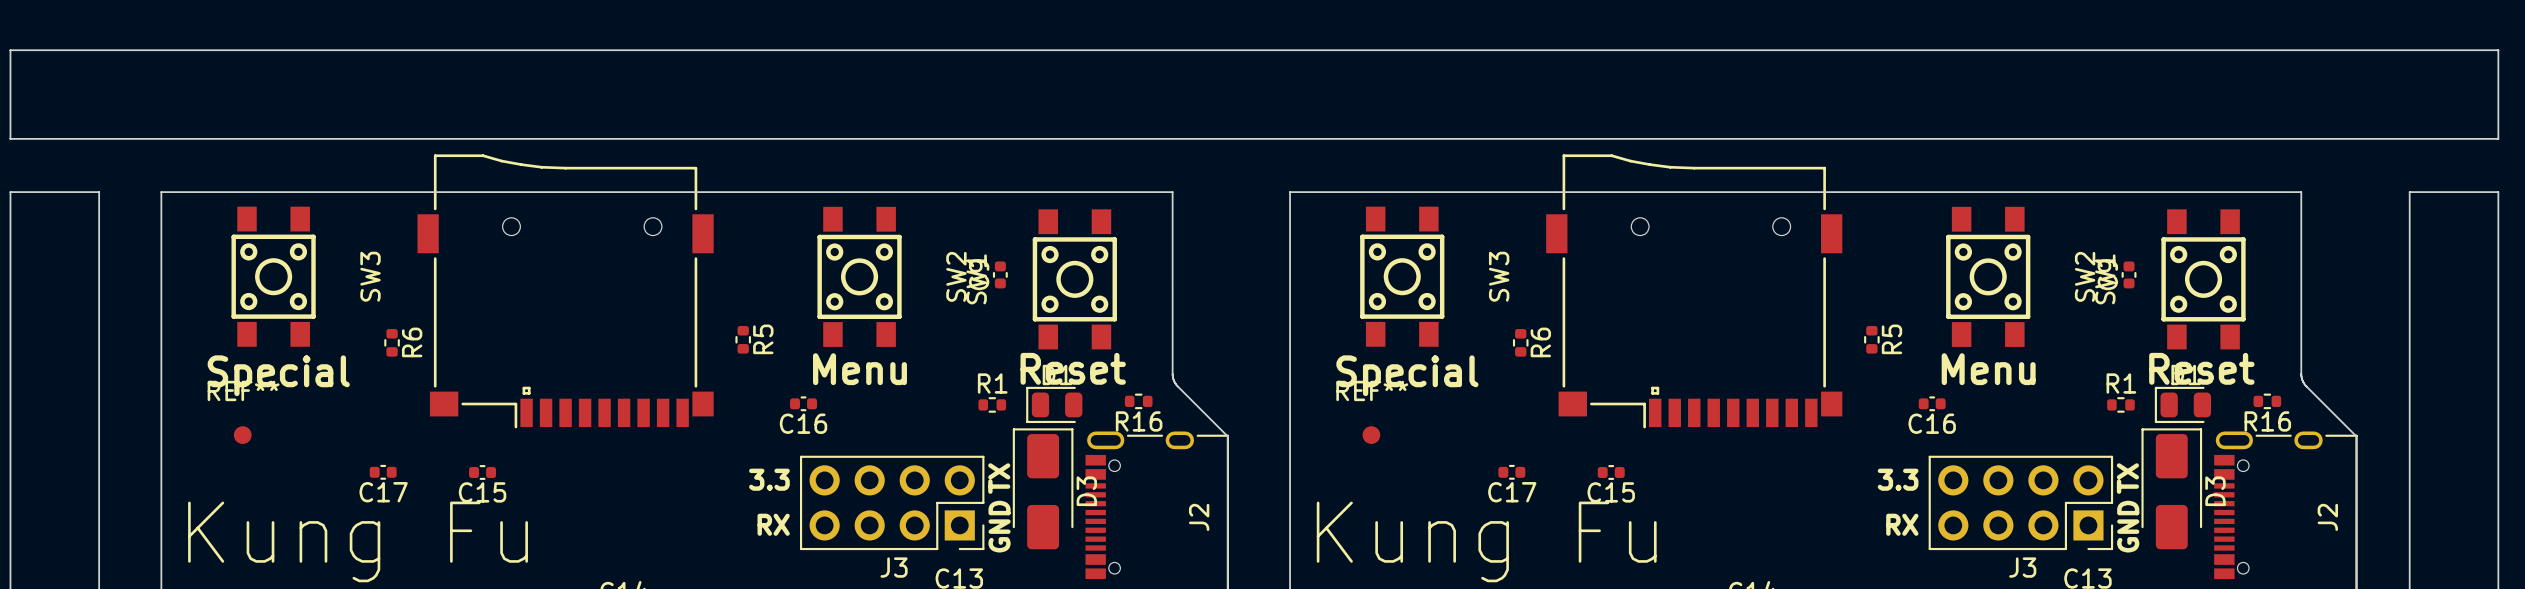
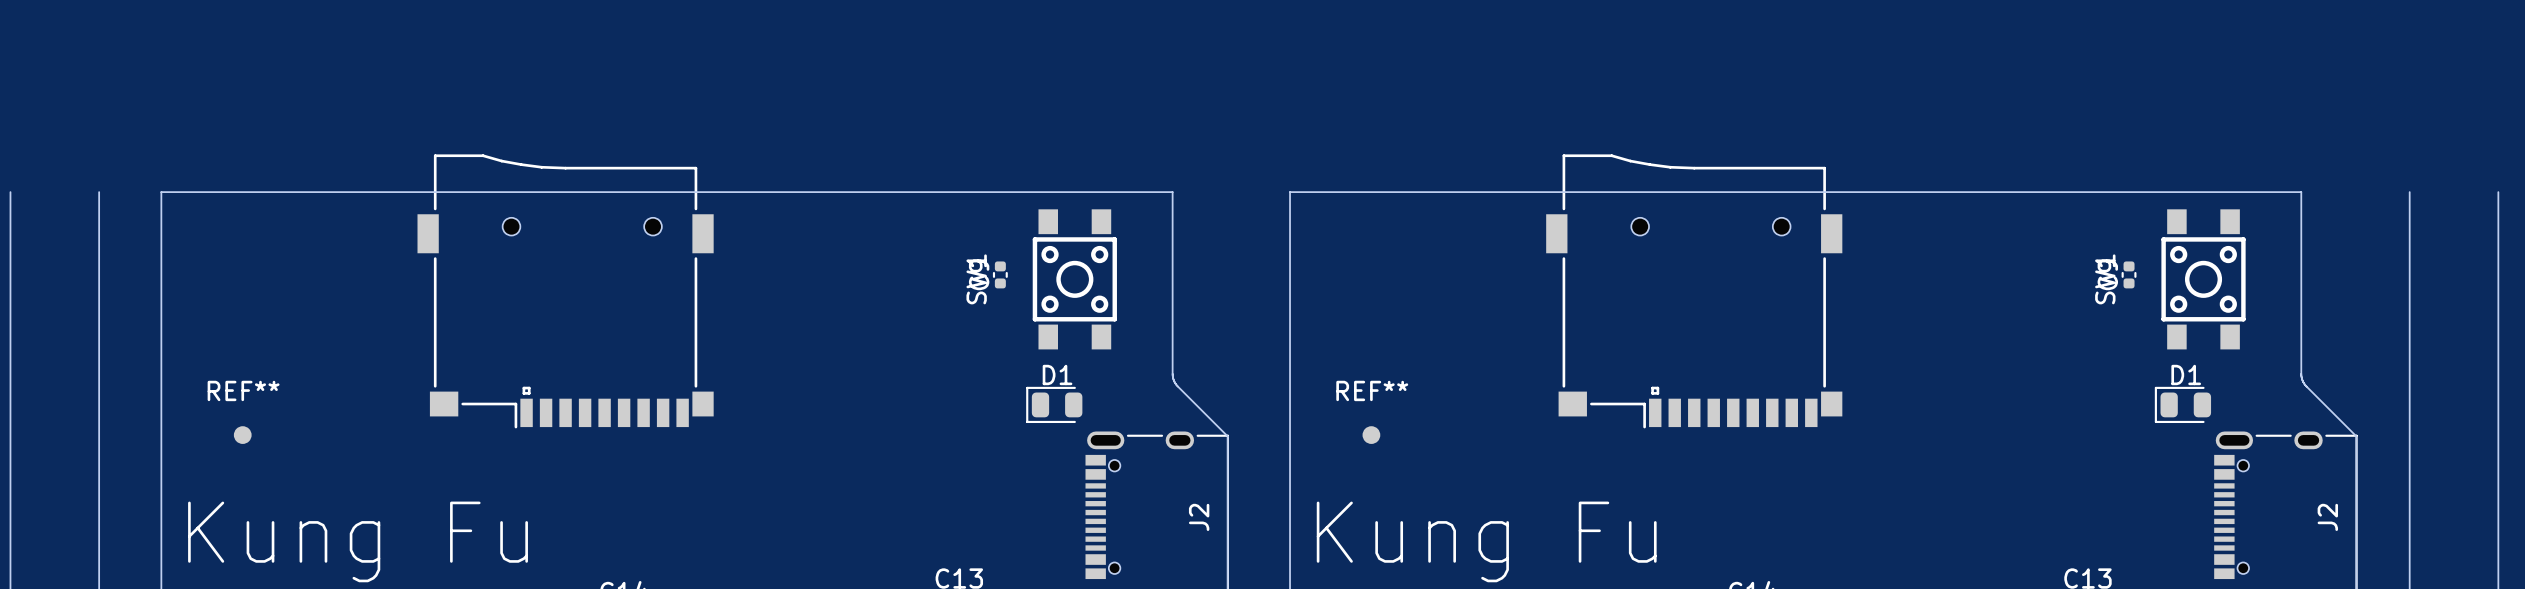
board edge: (10, 50) (2498, 50) -> none
board edge: (10, 50) (10, 138) -> none
board edge: (2498, 50) (2498, 138) -> none
board edge: (10, 138) (2498, 138) -> none
board edge: (10, 192) (98, 192) -> none
board edge: (2409, 192) (2498, 192) -> none
SW3: (273, 276) -> none
SW2: (859, 276) -> none
SW3: (1402, 276) -> none
SW2: (1988, 276) -> none
R5: (743, 339) -> none
R5: (1871, 339) -> none
R6: (392, 342) -> none
R6: (1520, 342) -> none
text: Reset (1073, 368) -> none
text: Reset (2201, 368) -> none
text: Menu (859, 369) -> none
text: Menu (1988, 369) -> none
text: Special (278, 375) -> none
text: Special (1407, 375) -> none
R16: (1138, 401) -> none
R16: (2267, 401) -> none
C16: (803, 403) -> none
C16: (1932, 403) -> none
R1: (992, 404) -> none
R1: (2120, 404) -> none
C17: (383, 472) -> none
C15: (482, 472) -> none
C17: (1511, 472) -> none
C15: (1611, 472) -> none
text: TX (999, 478) -> none
text: TX (2127, 478) -> none
text: 3.3 (769, 479) -> none
text: 3.3 (1898, 479) -> none
D3: (1043, 488) -> none
D3: (2171, 488) -> none
J3: (892, 502) -> none
J3: (2020, 502) -> none
text: RX (773, 524) -> none
text: RX (1902, 524) -> none
text: GND (999, 526) -> none
text: GND (2128, 526) -> none

